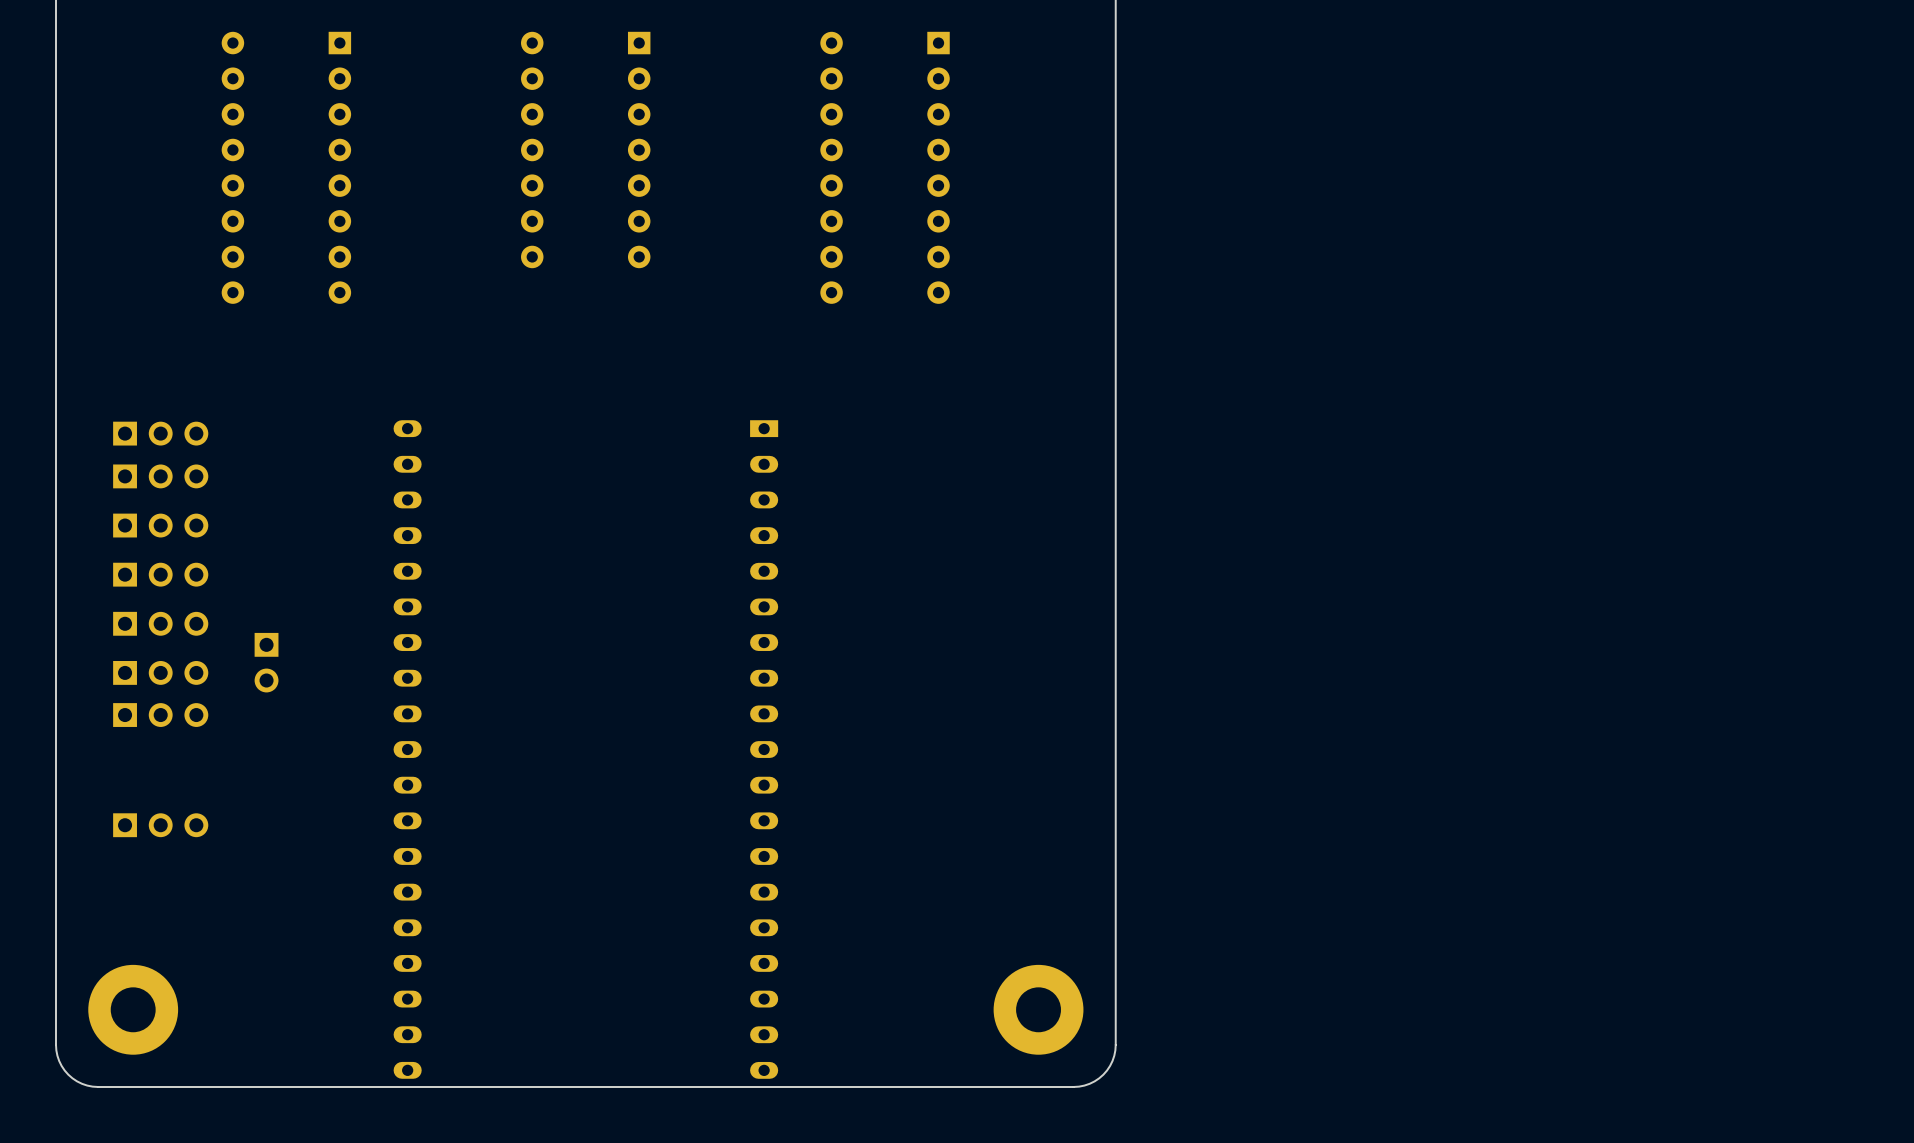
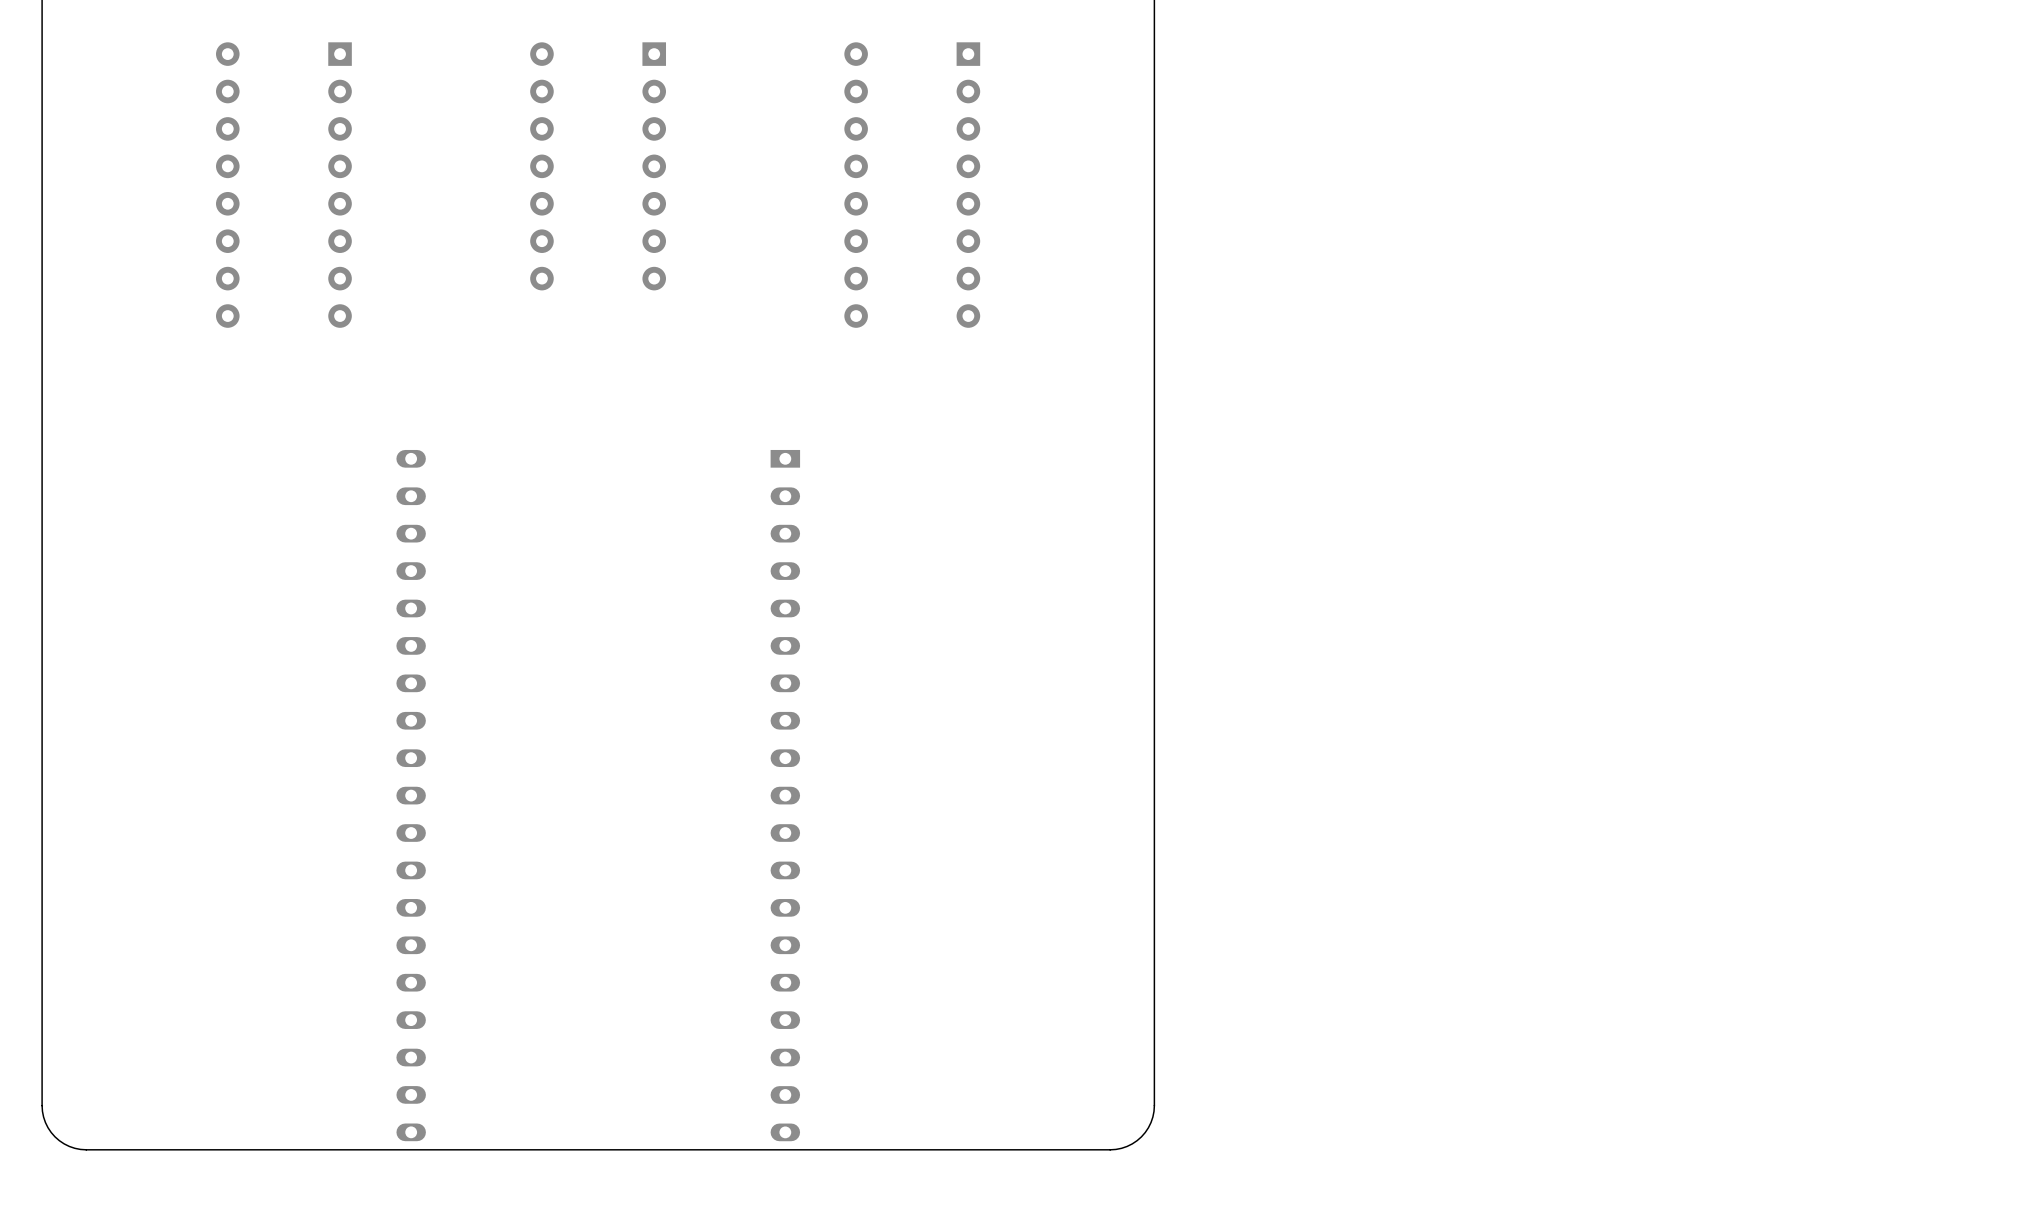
part: (160, 433) -> none
part: (160, 476) -> none
part: (160, 525) -> none
part: (160, 574) -> none
part: (160, 623) -> none
part: (266, 662) -> none
part: (160, 672) -> none
part: (160, 715) -> none
part: (160, 825) -> none
part: (133, 1009) -> none
part: (1038, 1009) -> none

